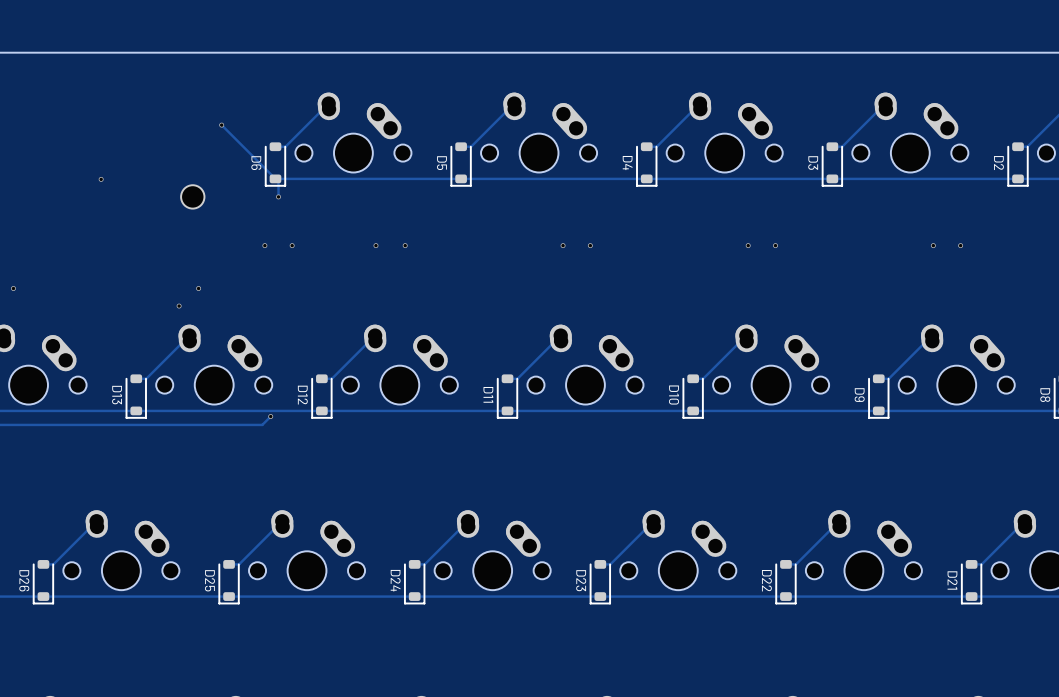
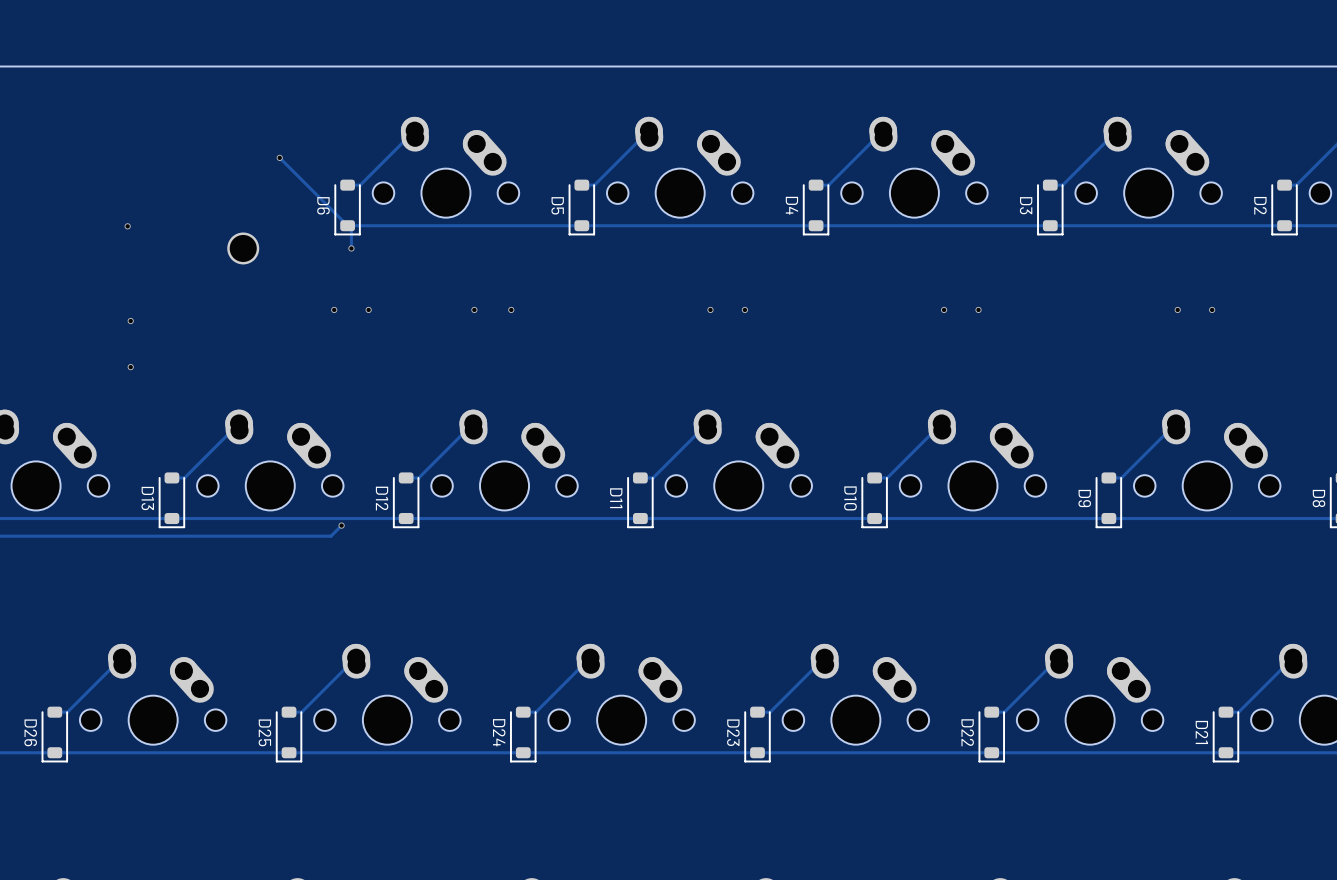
via: none -> (130, 321)
via: (13, 288) -> none
via: (198, 288) -> none
via: none -> (130, 367)
via: (179, 306) -> none

